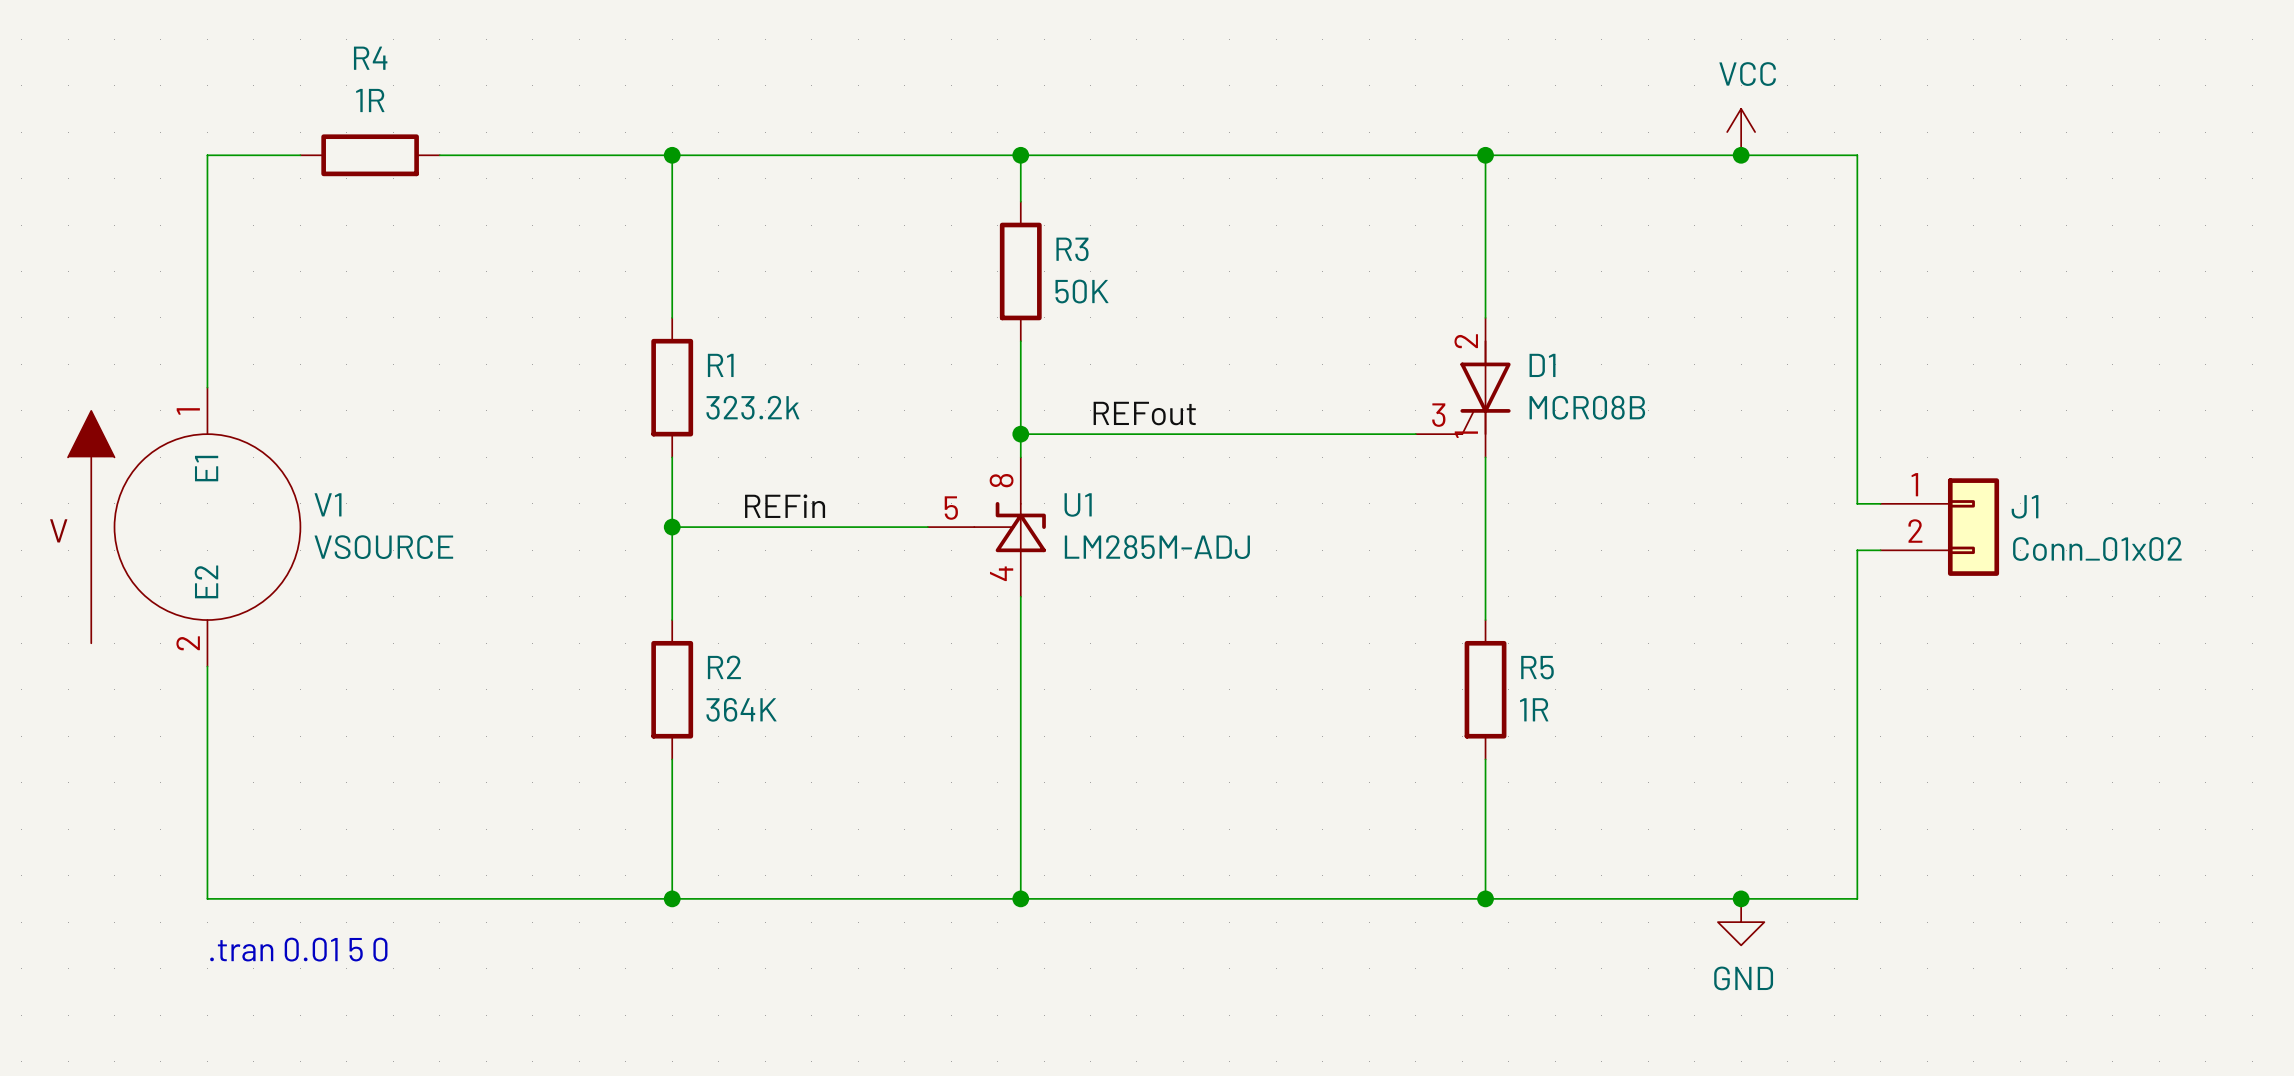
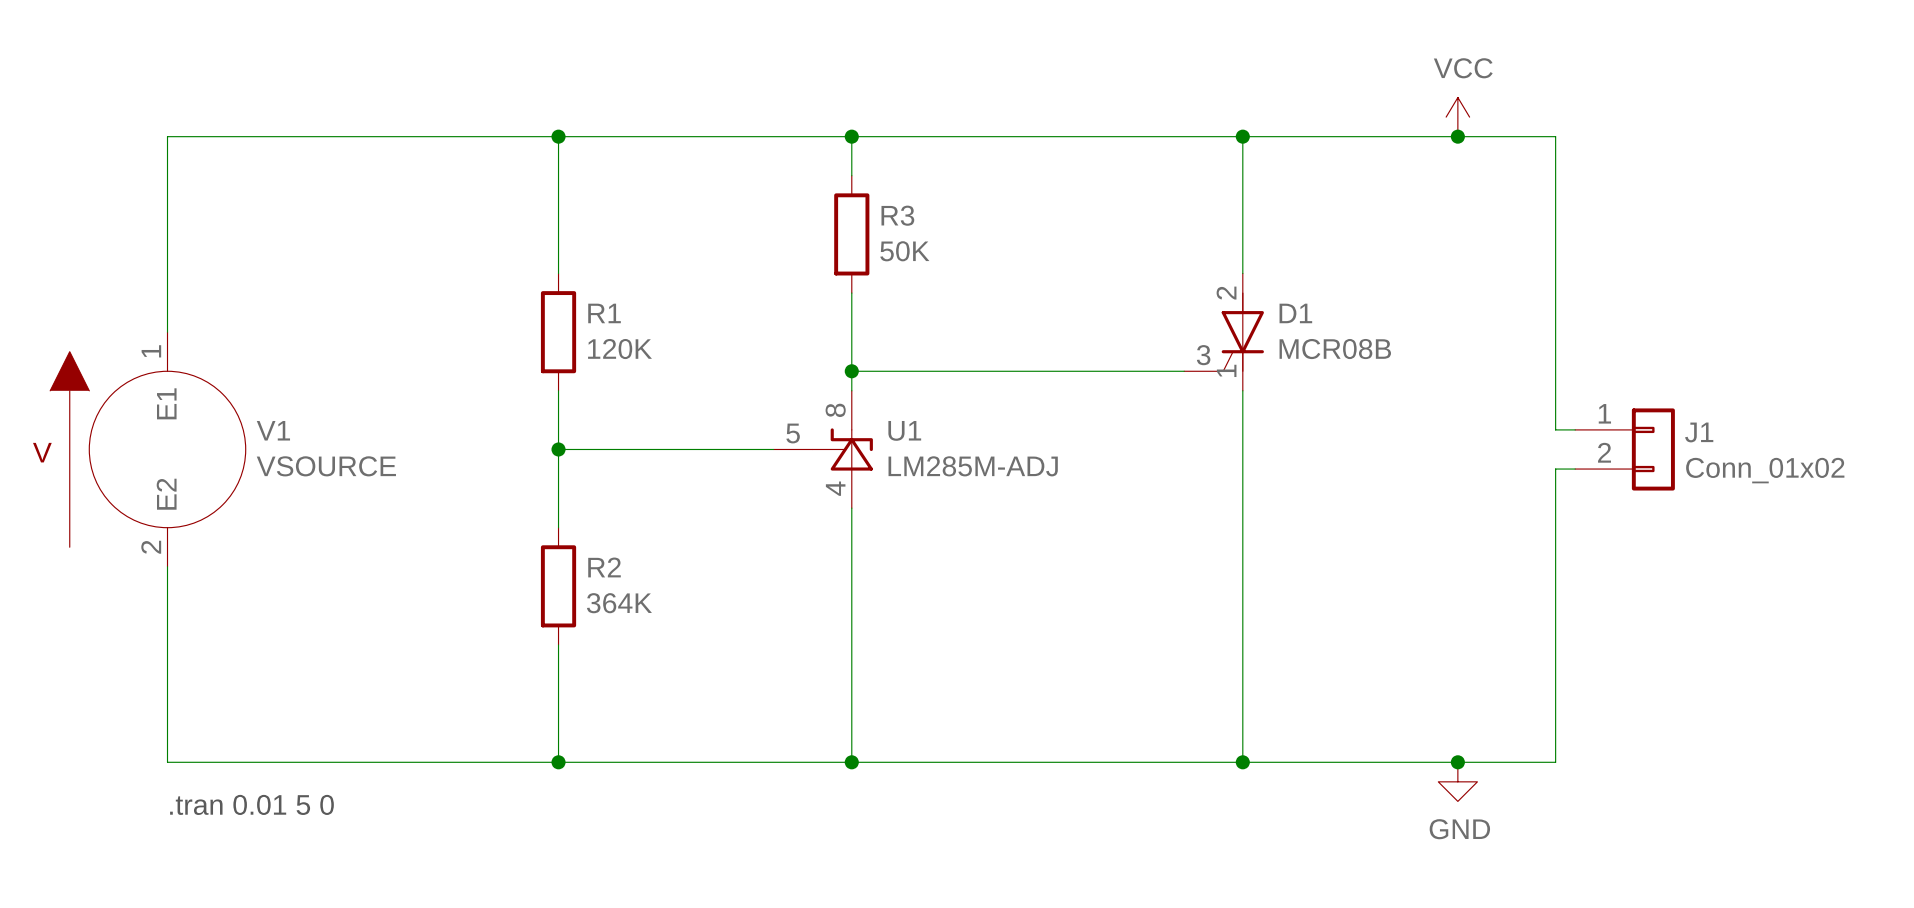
wire: none -> (245, 136) (363, 136)
R4: 1R (370, 155) -> none
R1 value: 323.2k (752, 407) -> 120K (620, 349)
label: REFout (1144, 413) -> none
label: REFin (785, 506) -> none
wire: none -> (1242, 527) (1242, 644)
R5: 1R (1485, 689) -> none

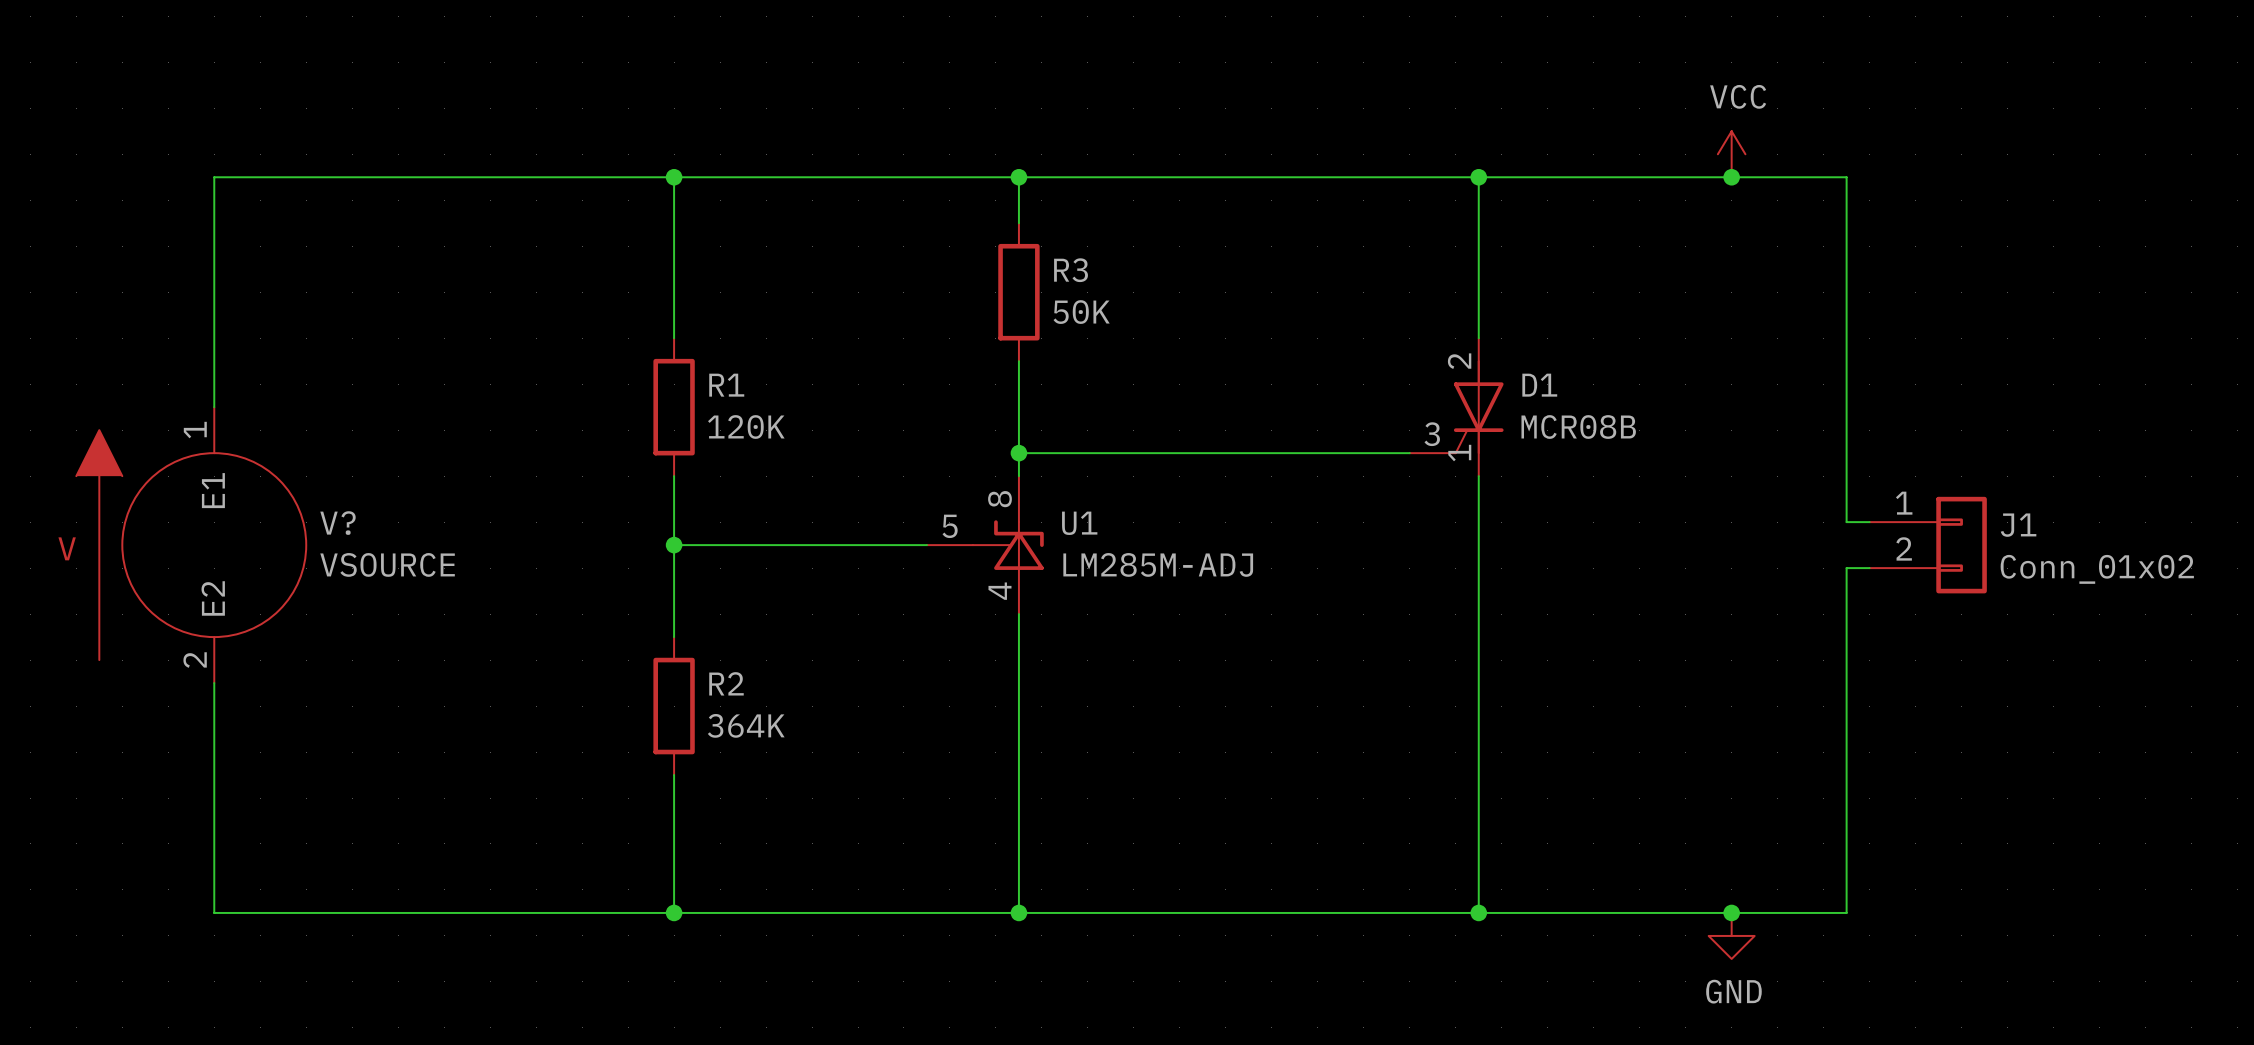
V1 name: V1 (273, 430) -> V? (337, 523)
text: .tran 0.01 5 0 (251, 804) -> none

